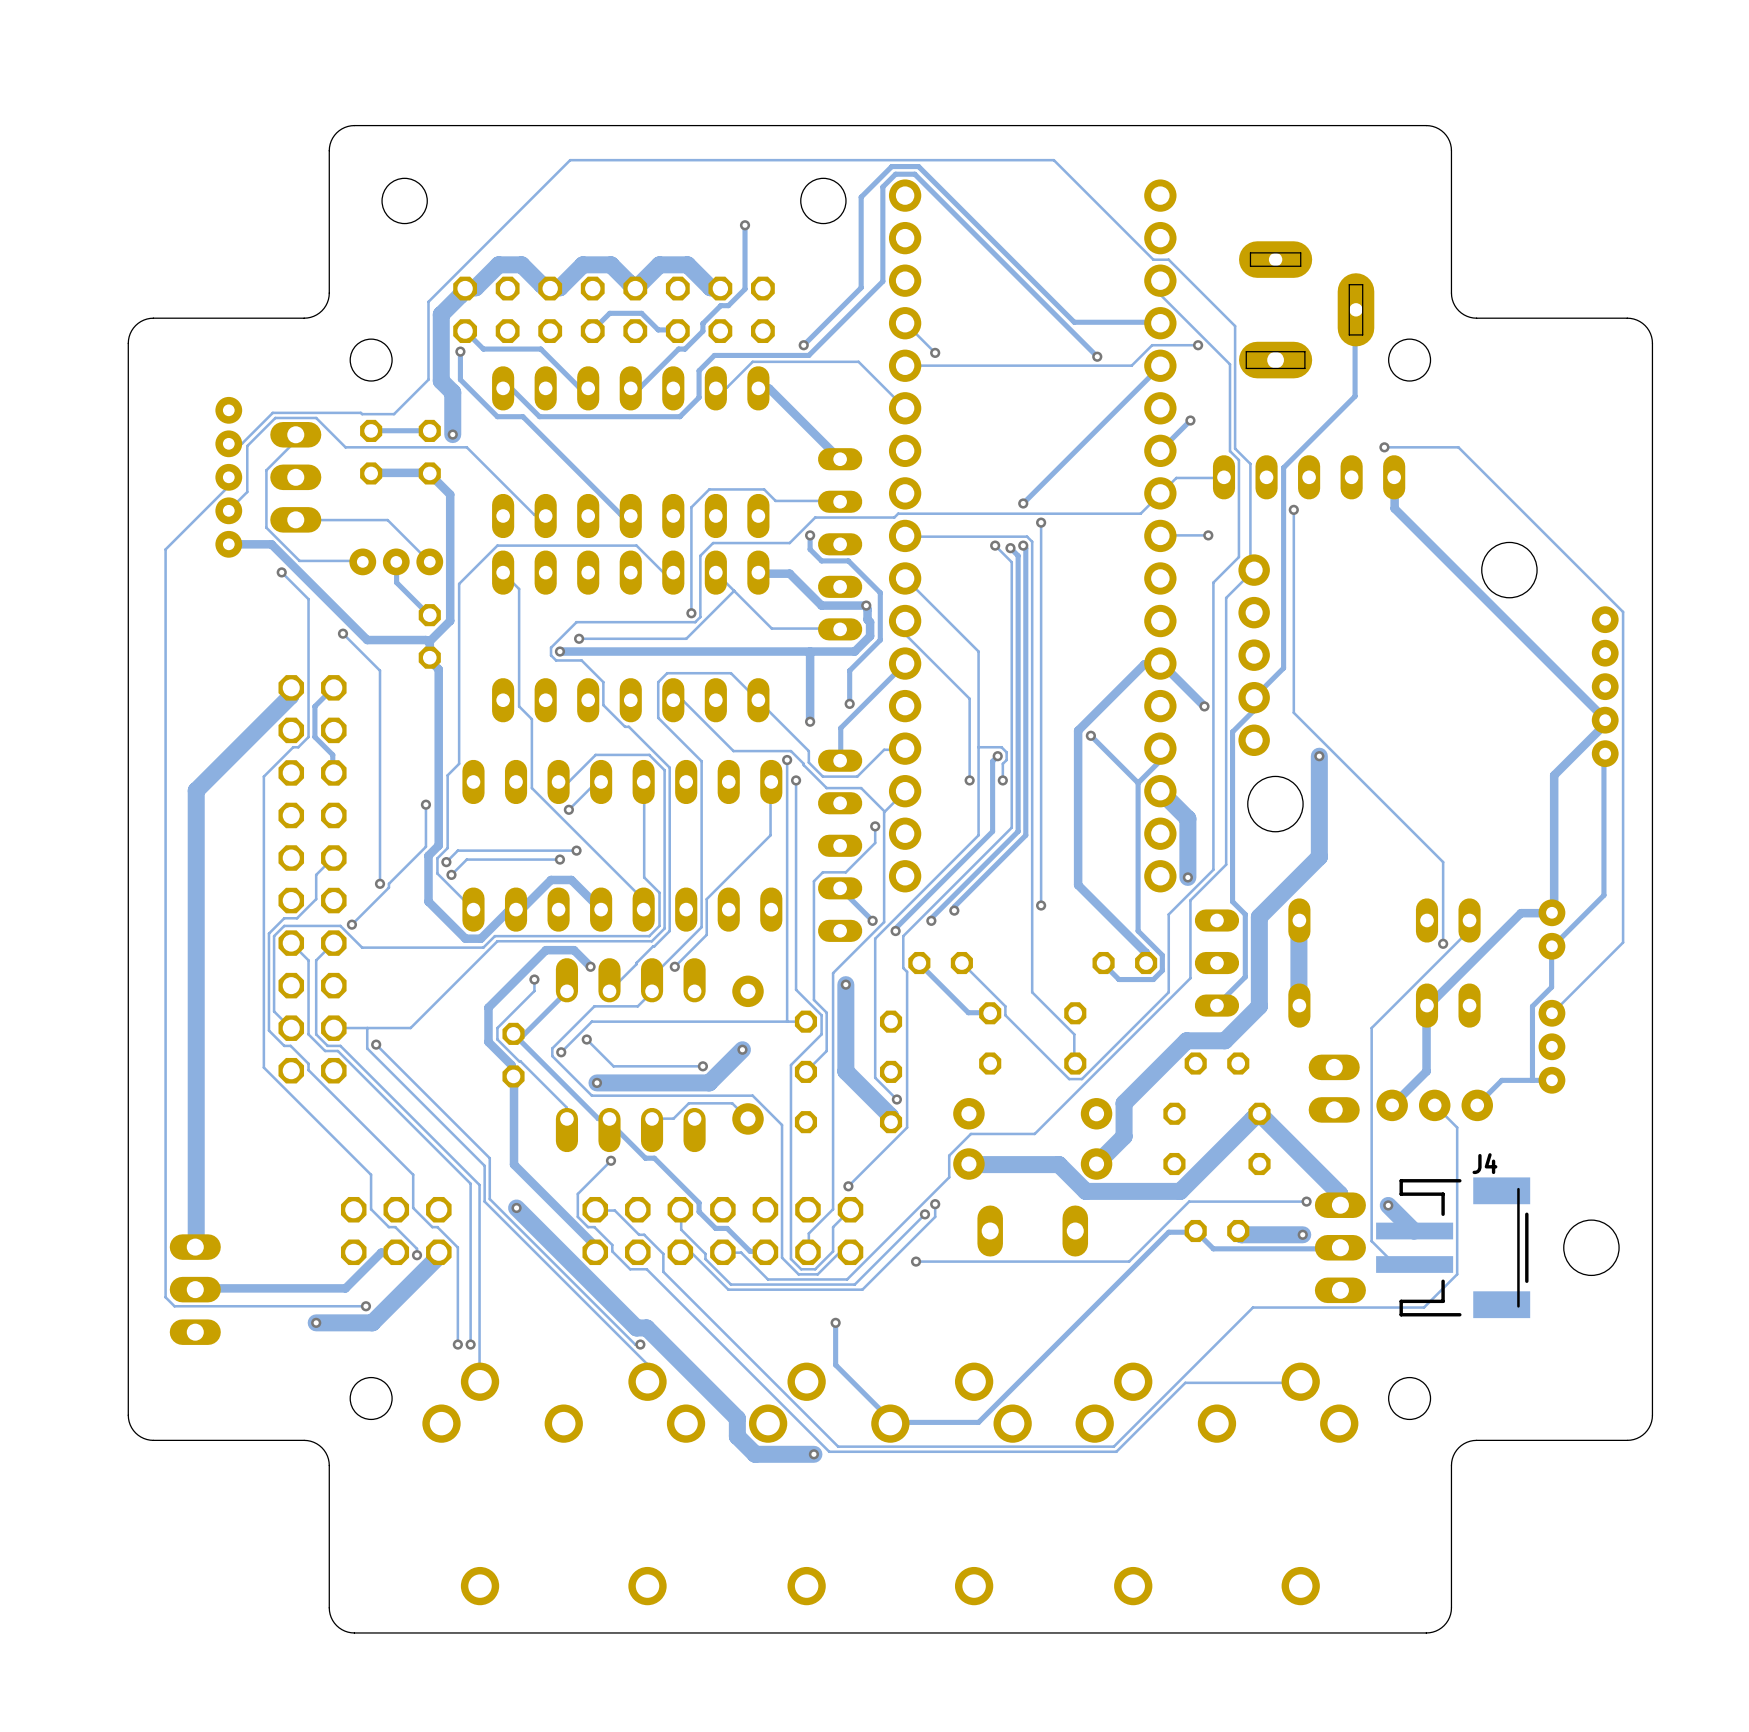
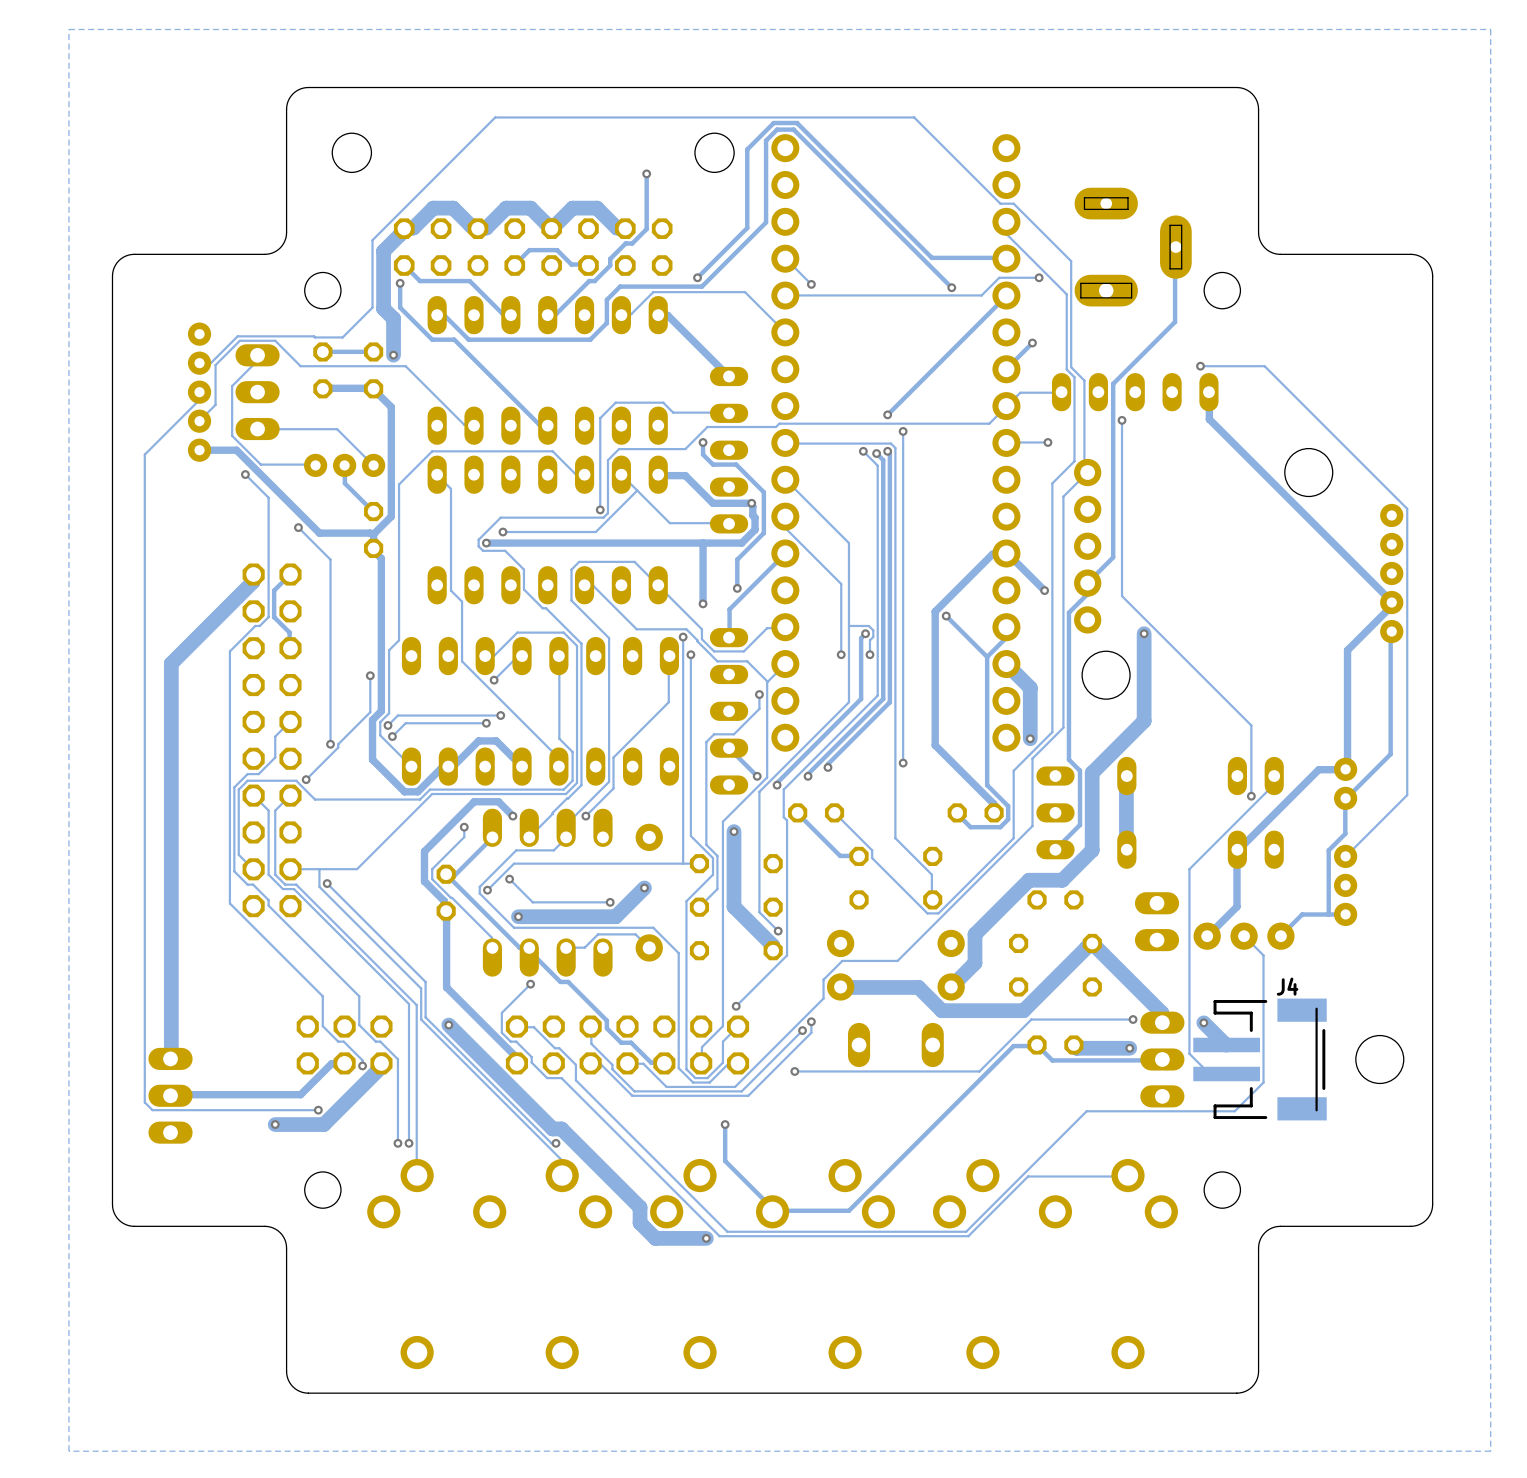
zone outline: none -> (1490, 29) (68, 29) (68, 1451) (1490, 1451) (1490, 29)

